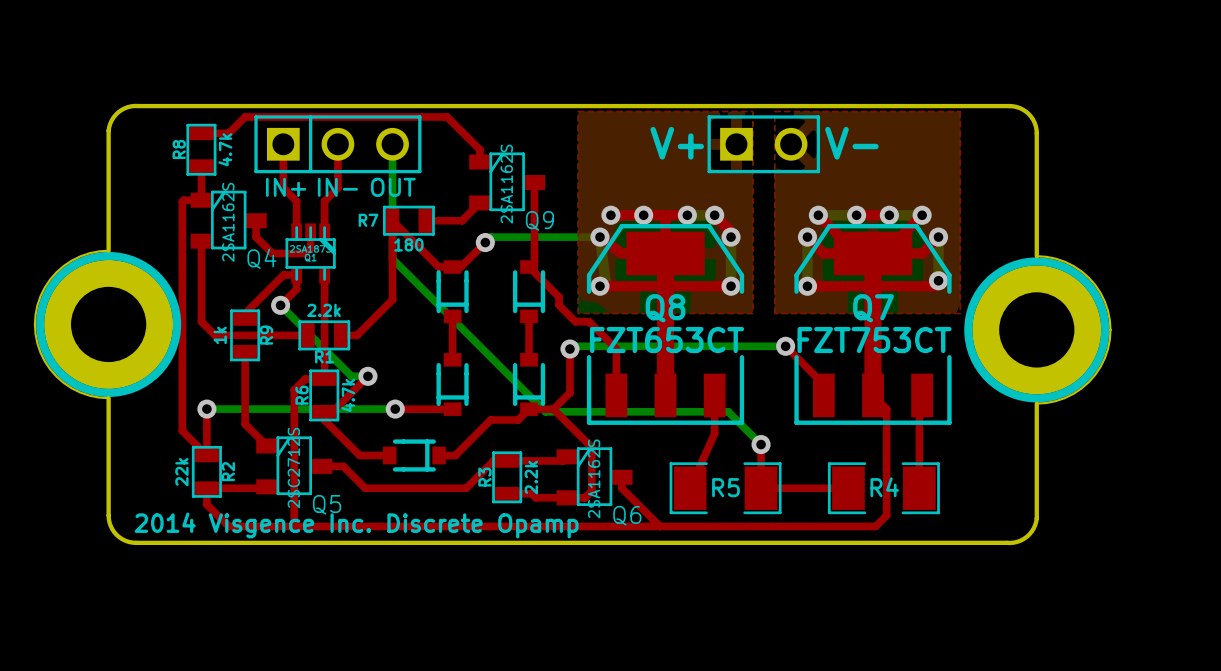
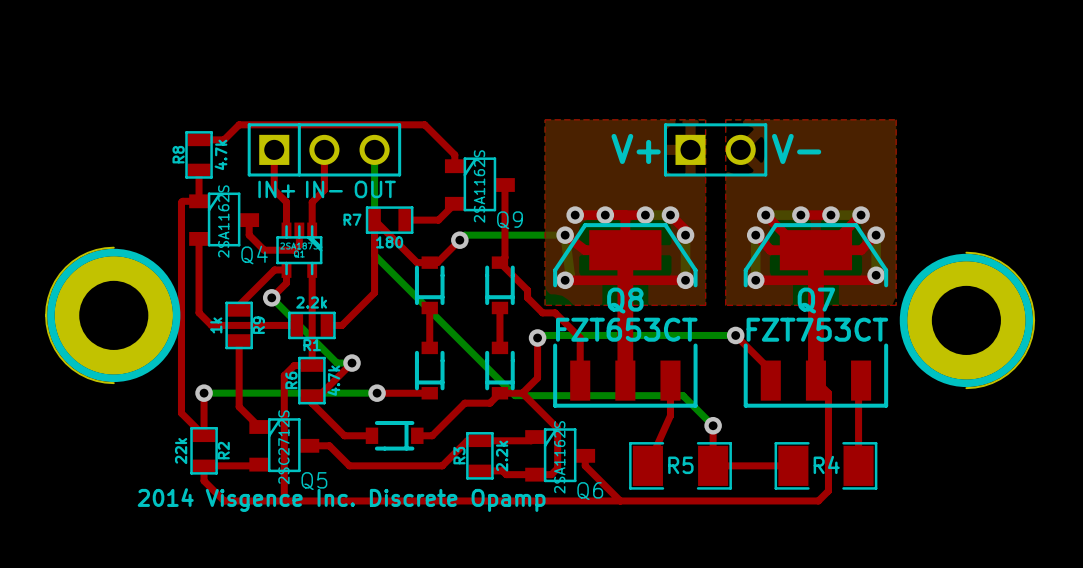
board edge: (108, 250) (108, 130) (115, 114) (131, 106) (1009, 106) (1019, 108) (1028, 114) (1036, 129) (1036, 256) -> none
board edge: (108, 398) (108, 519) (116, 534) (125, 540) (135, 542) (1013, 542) (1029, 534) (1036, 518) (1036, 403) -> none

